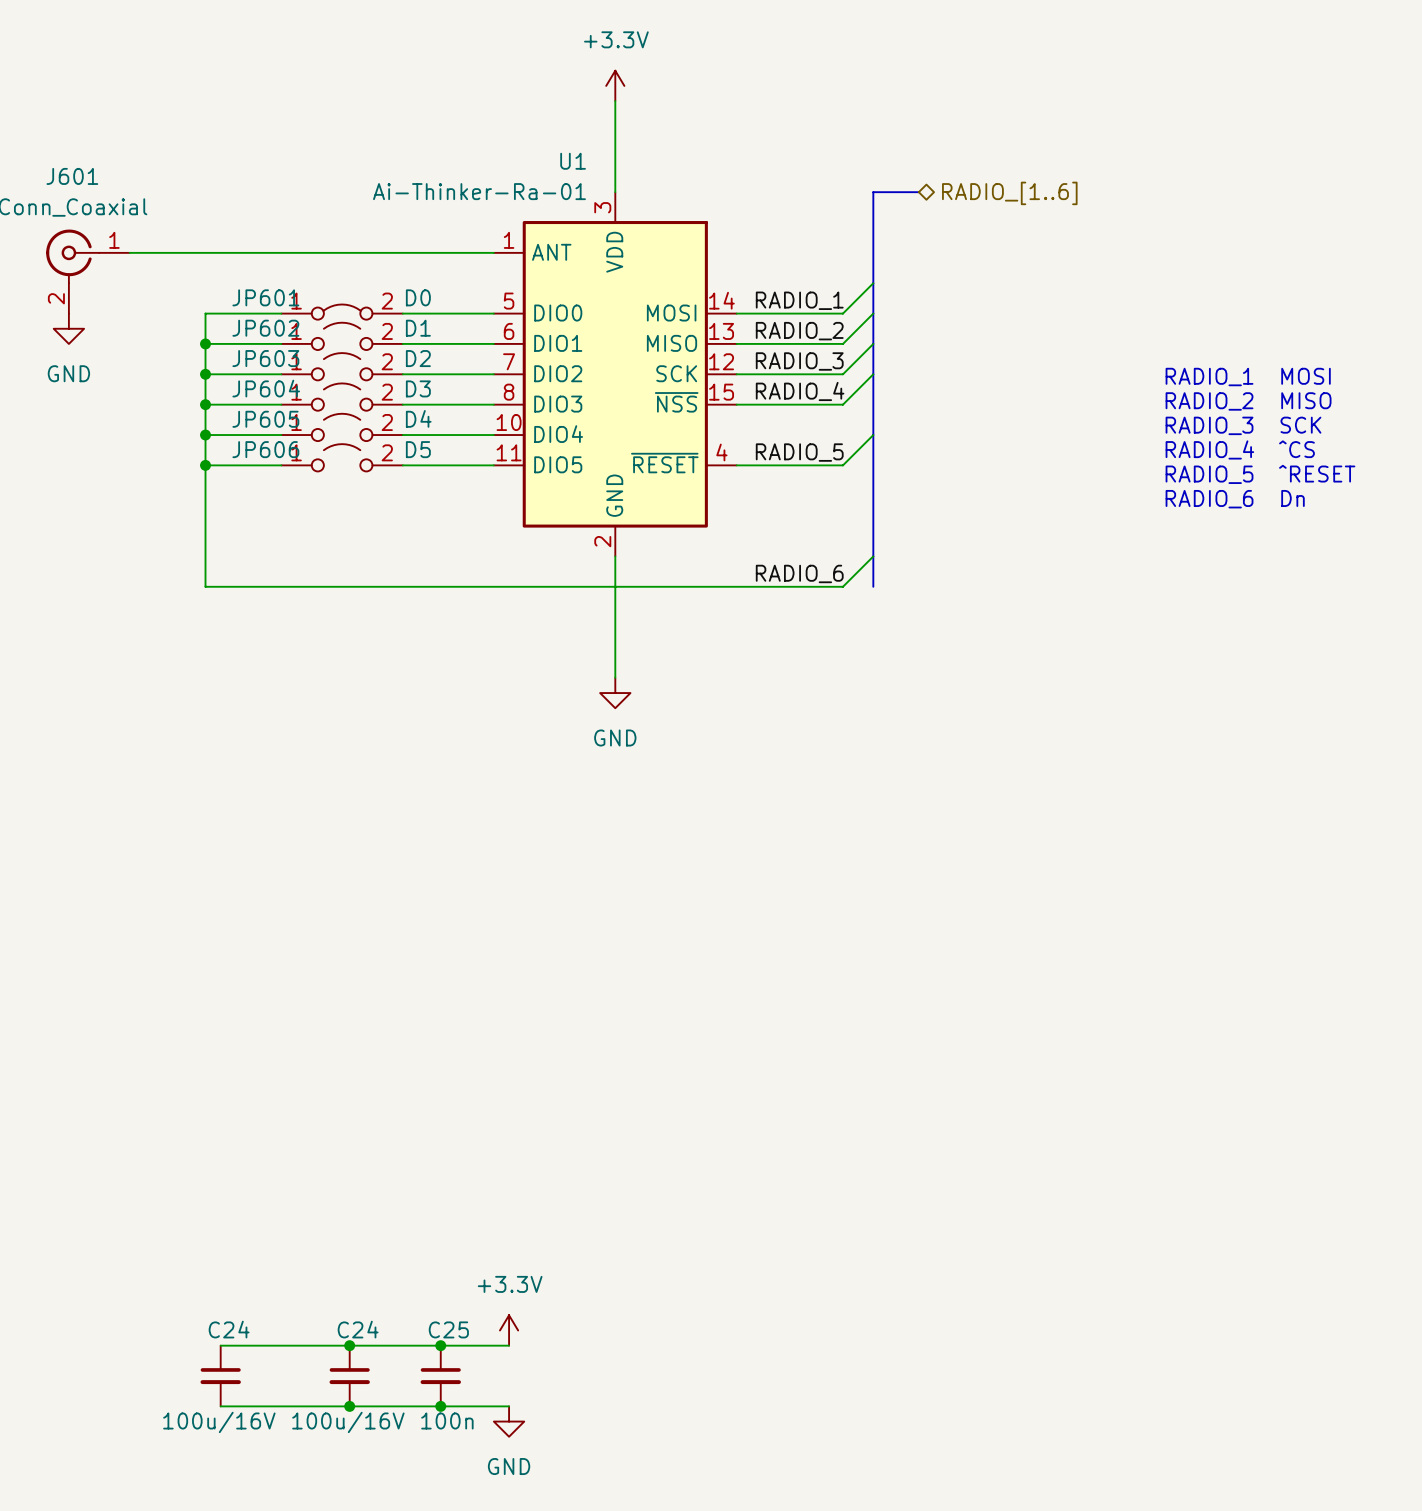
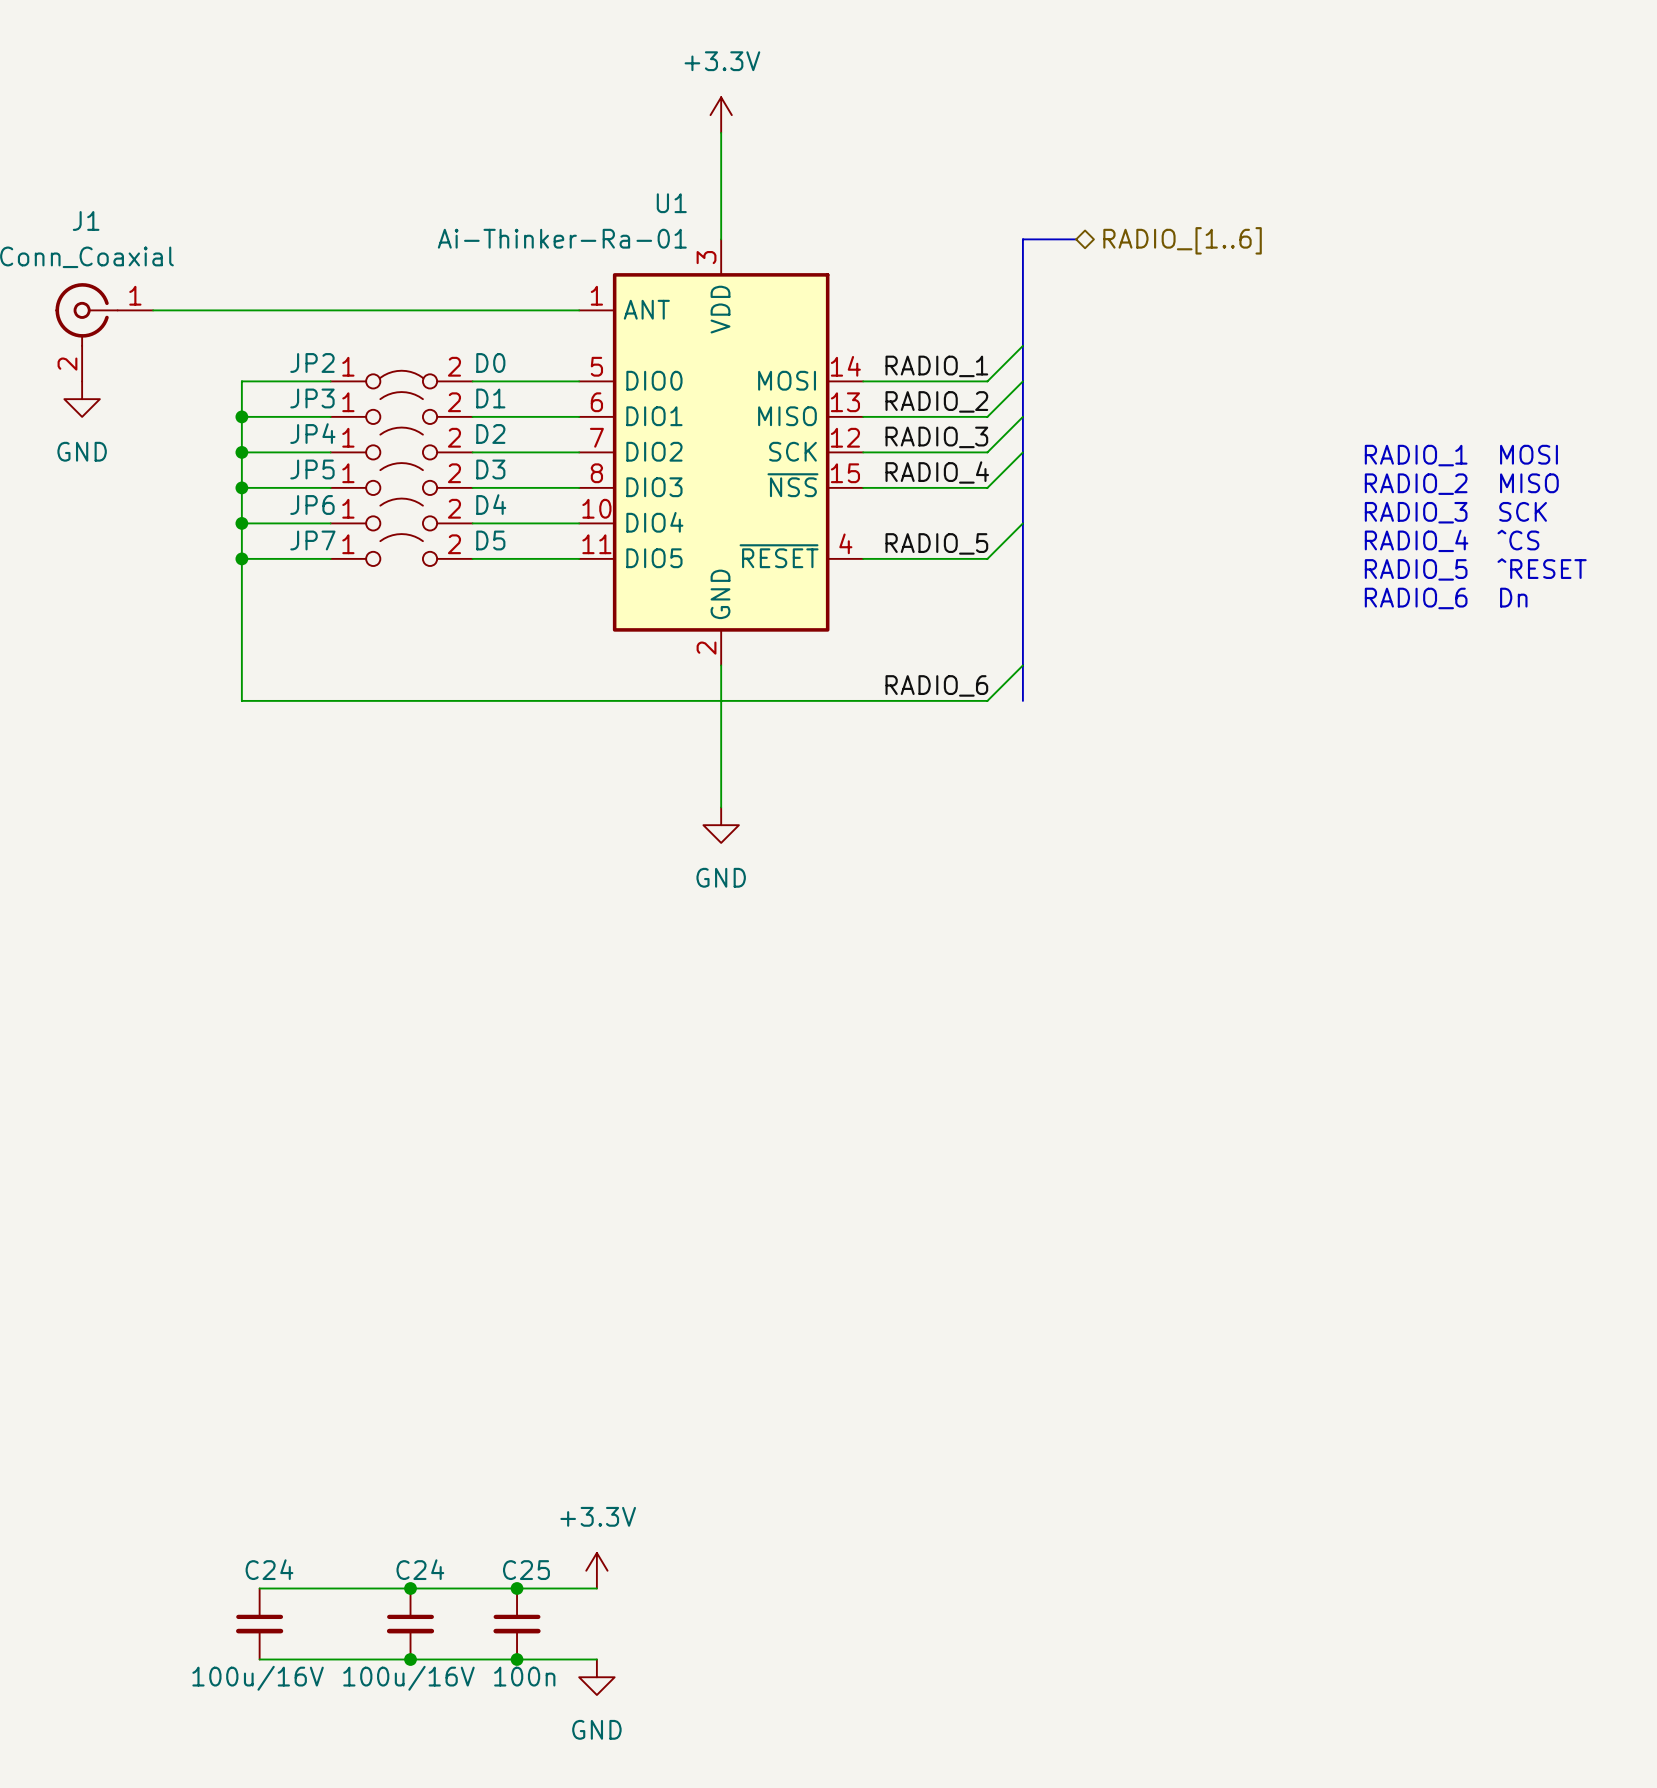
J601 name: J601 (72, 176) -> J1 (86, 220)
JP601 name: JP601 (265, 297) -> JP2 (312, 362)
JP602 name: JP602 (265, 328) -> JP3 (312, 398)
JP603 name: JP603 (265, 358) -> JP4 (312, 433)
JP604 name: JP604 (266, 388) -> JP5 (312, 469)
JP605 name: JP605 (265, 419) -> JP6 (312, 504)
JP606 name: JP606 (265, 449) -> JP7 (312, 540)

